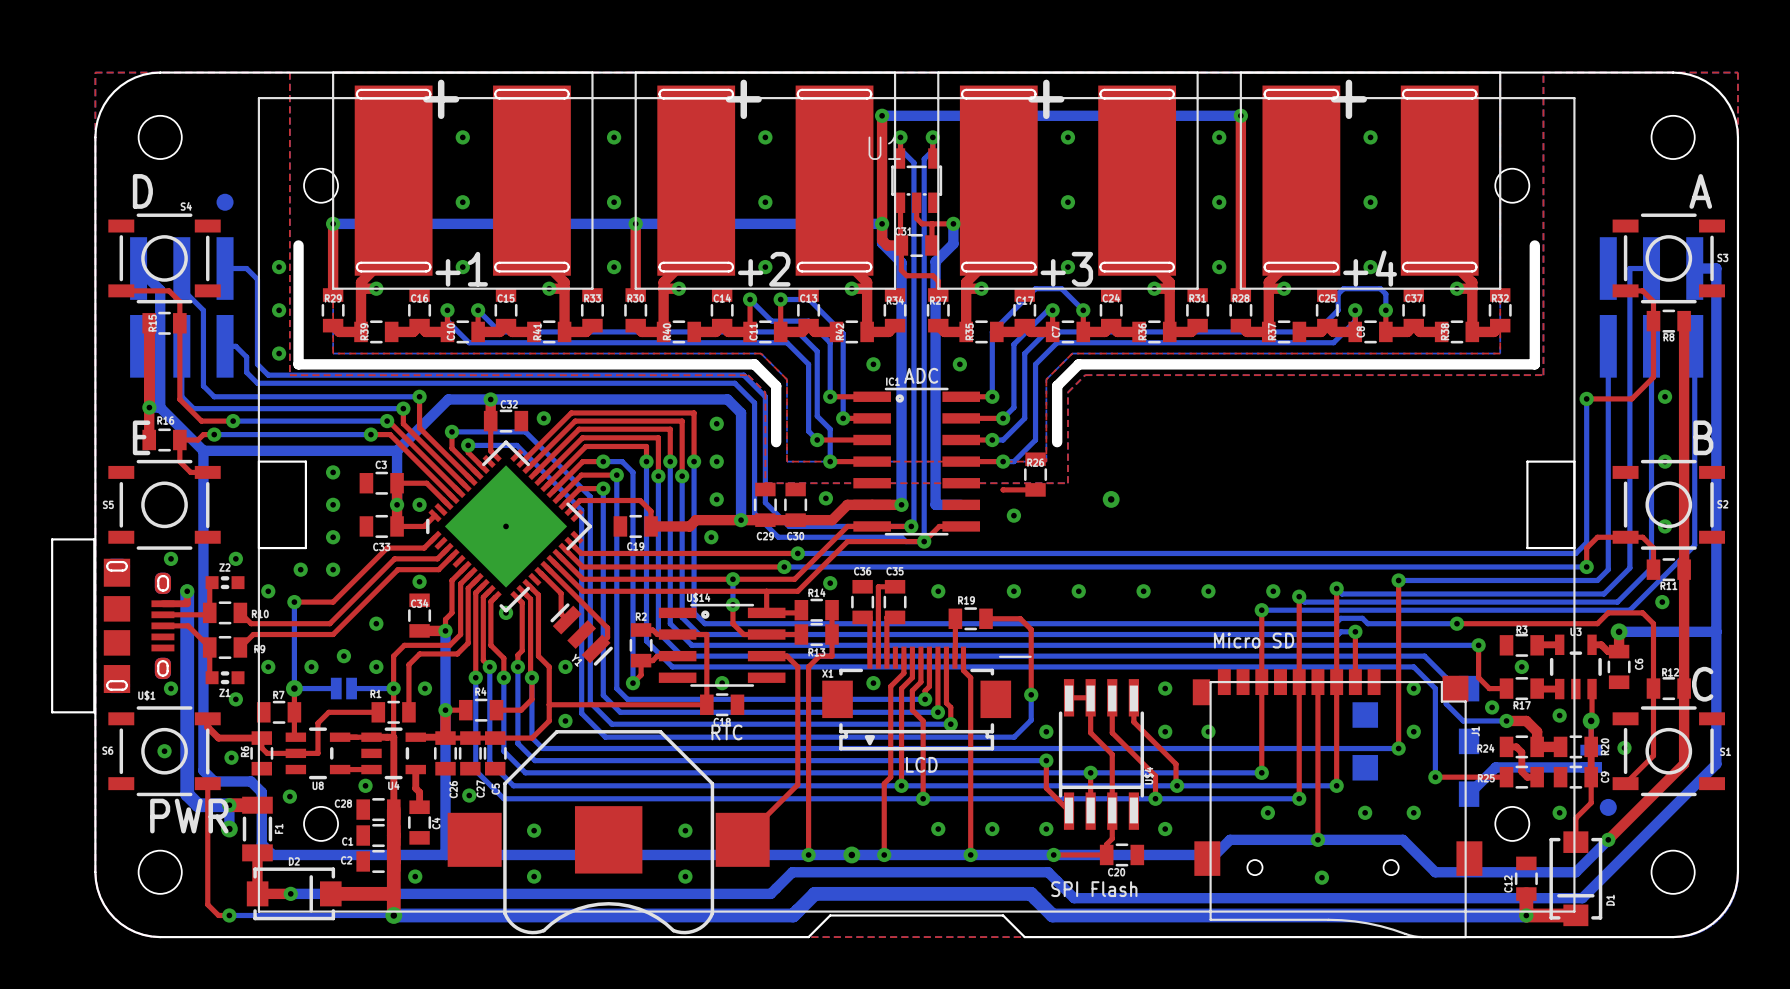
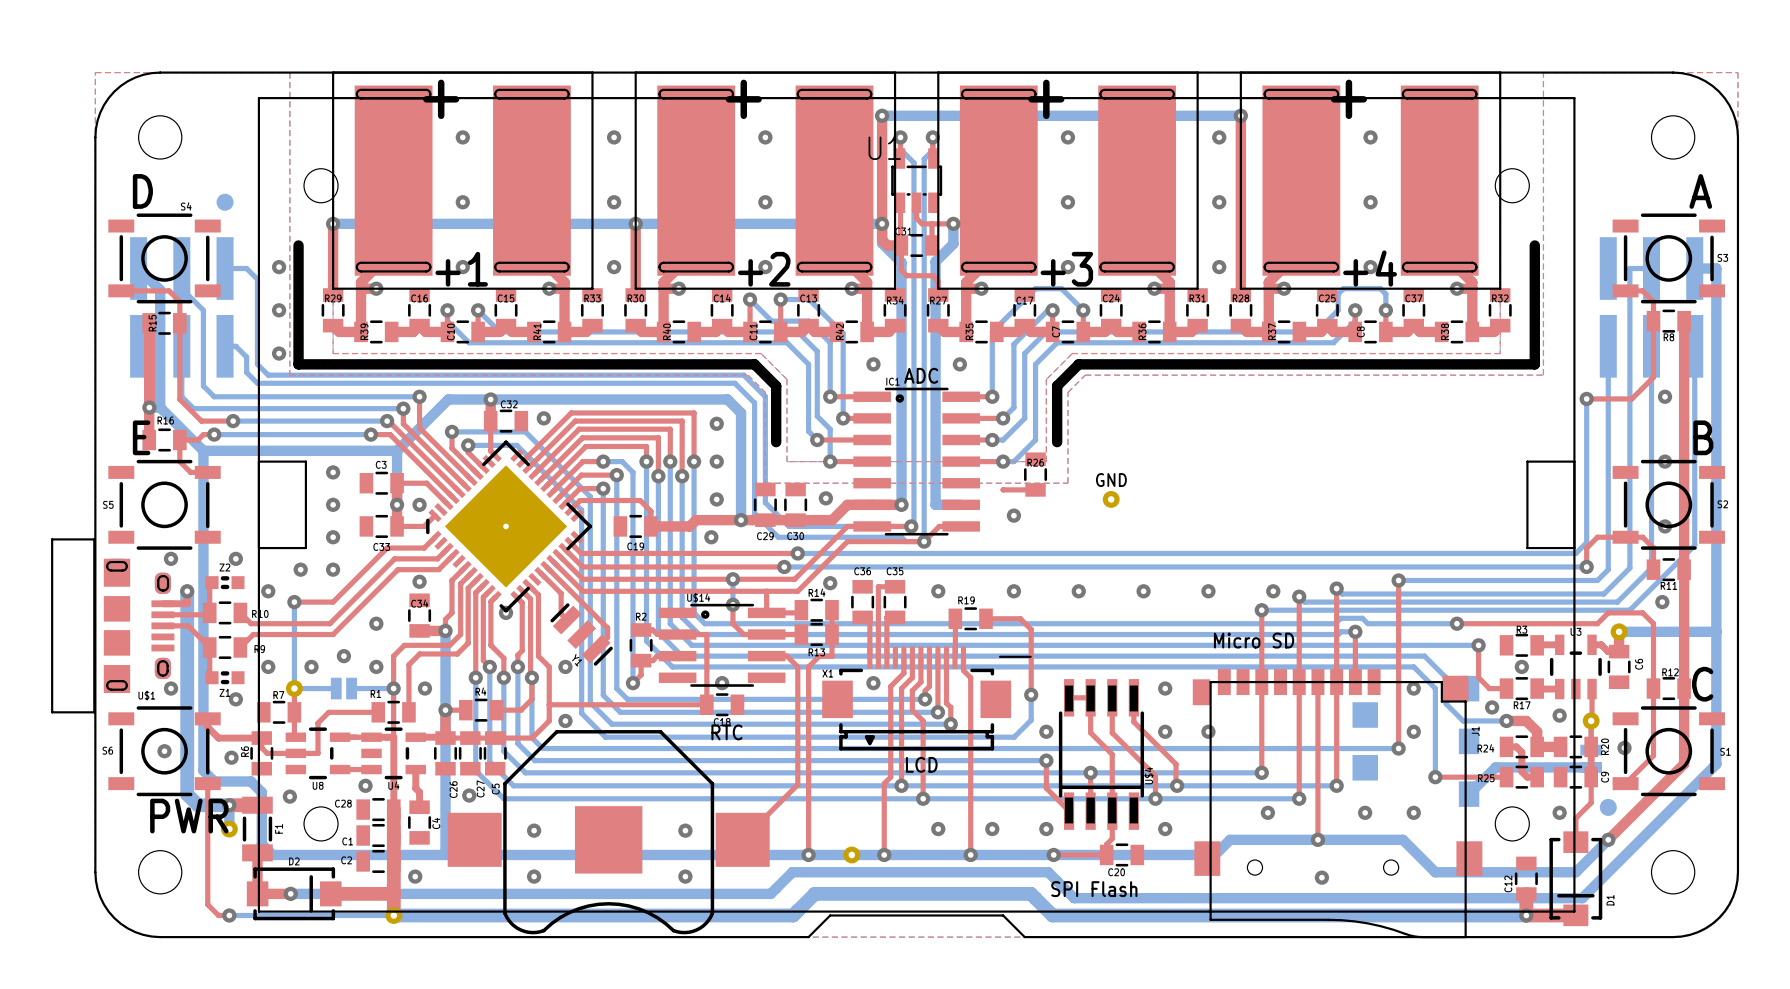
text: none -> GND (1111, 480)

